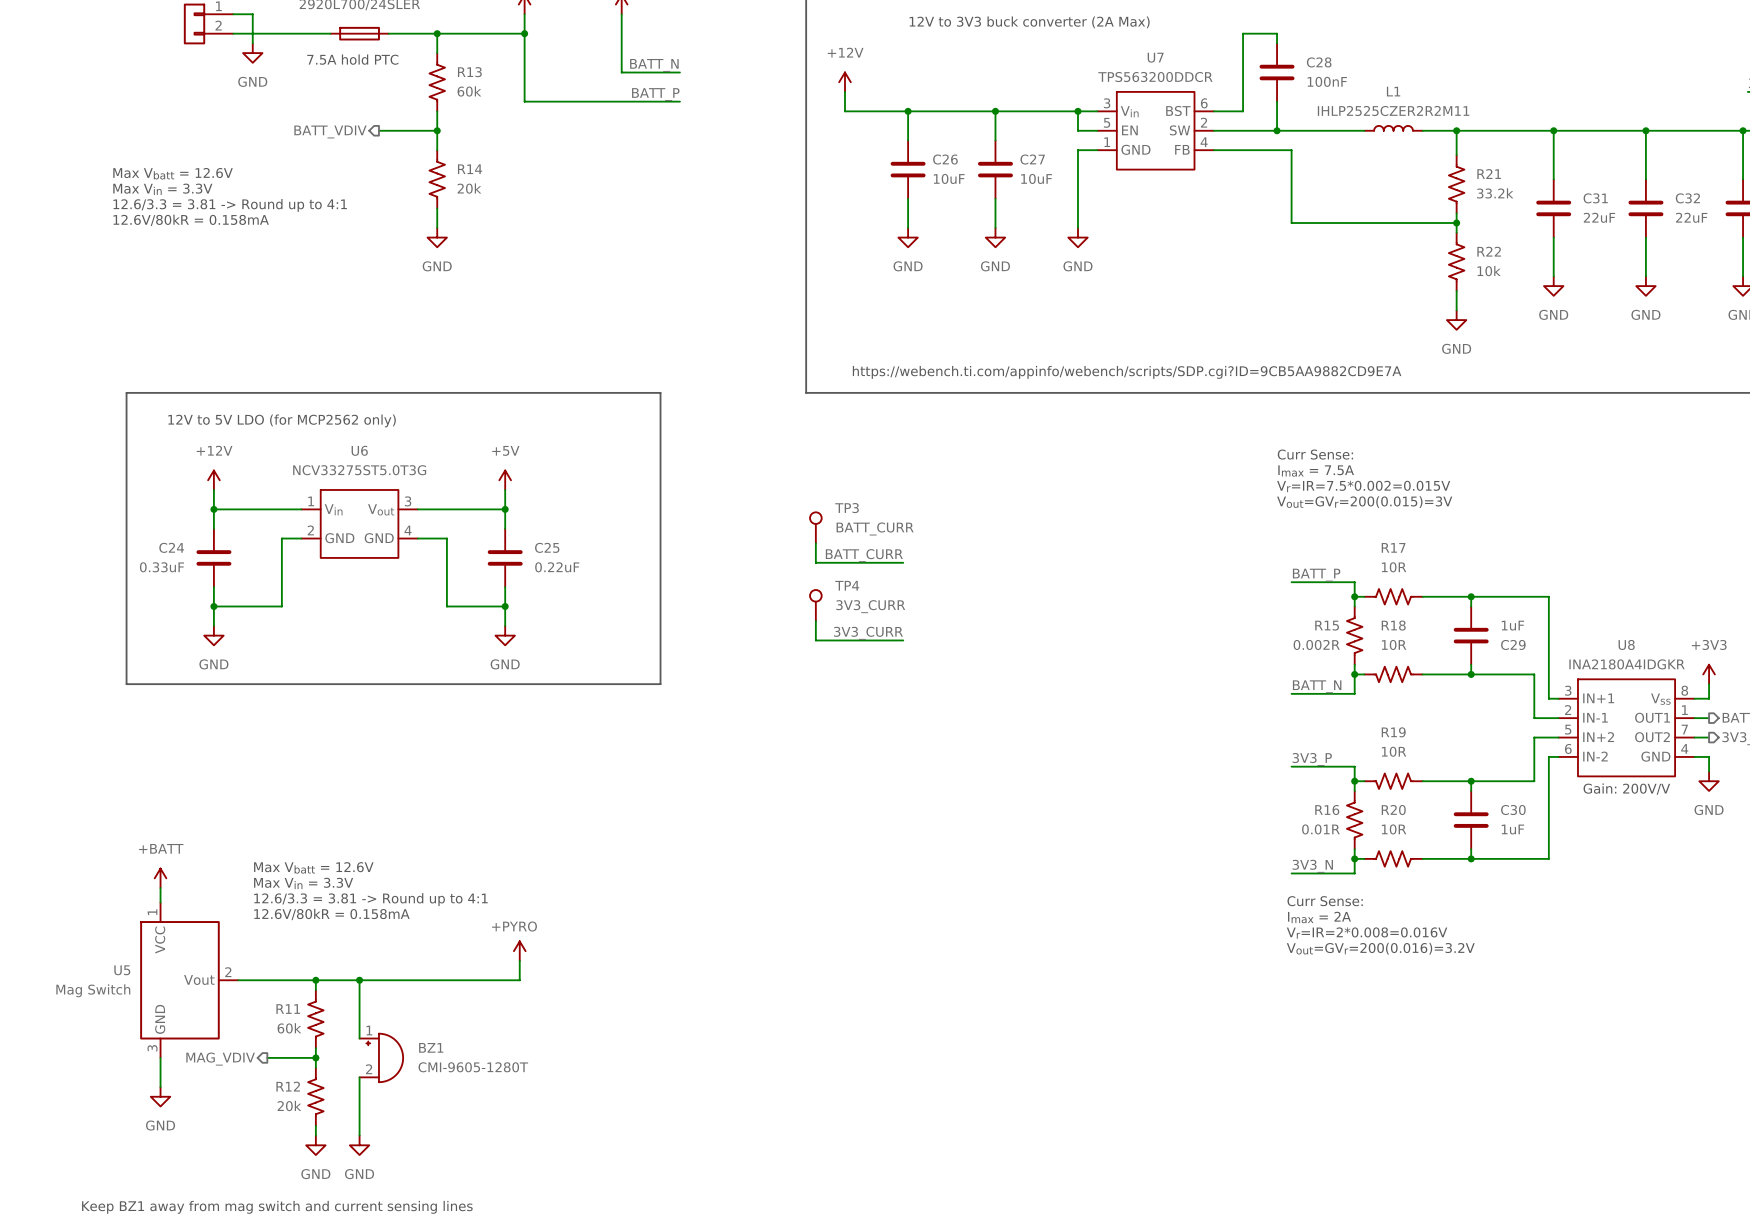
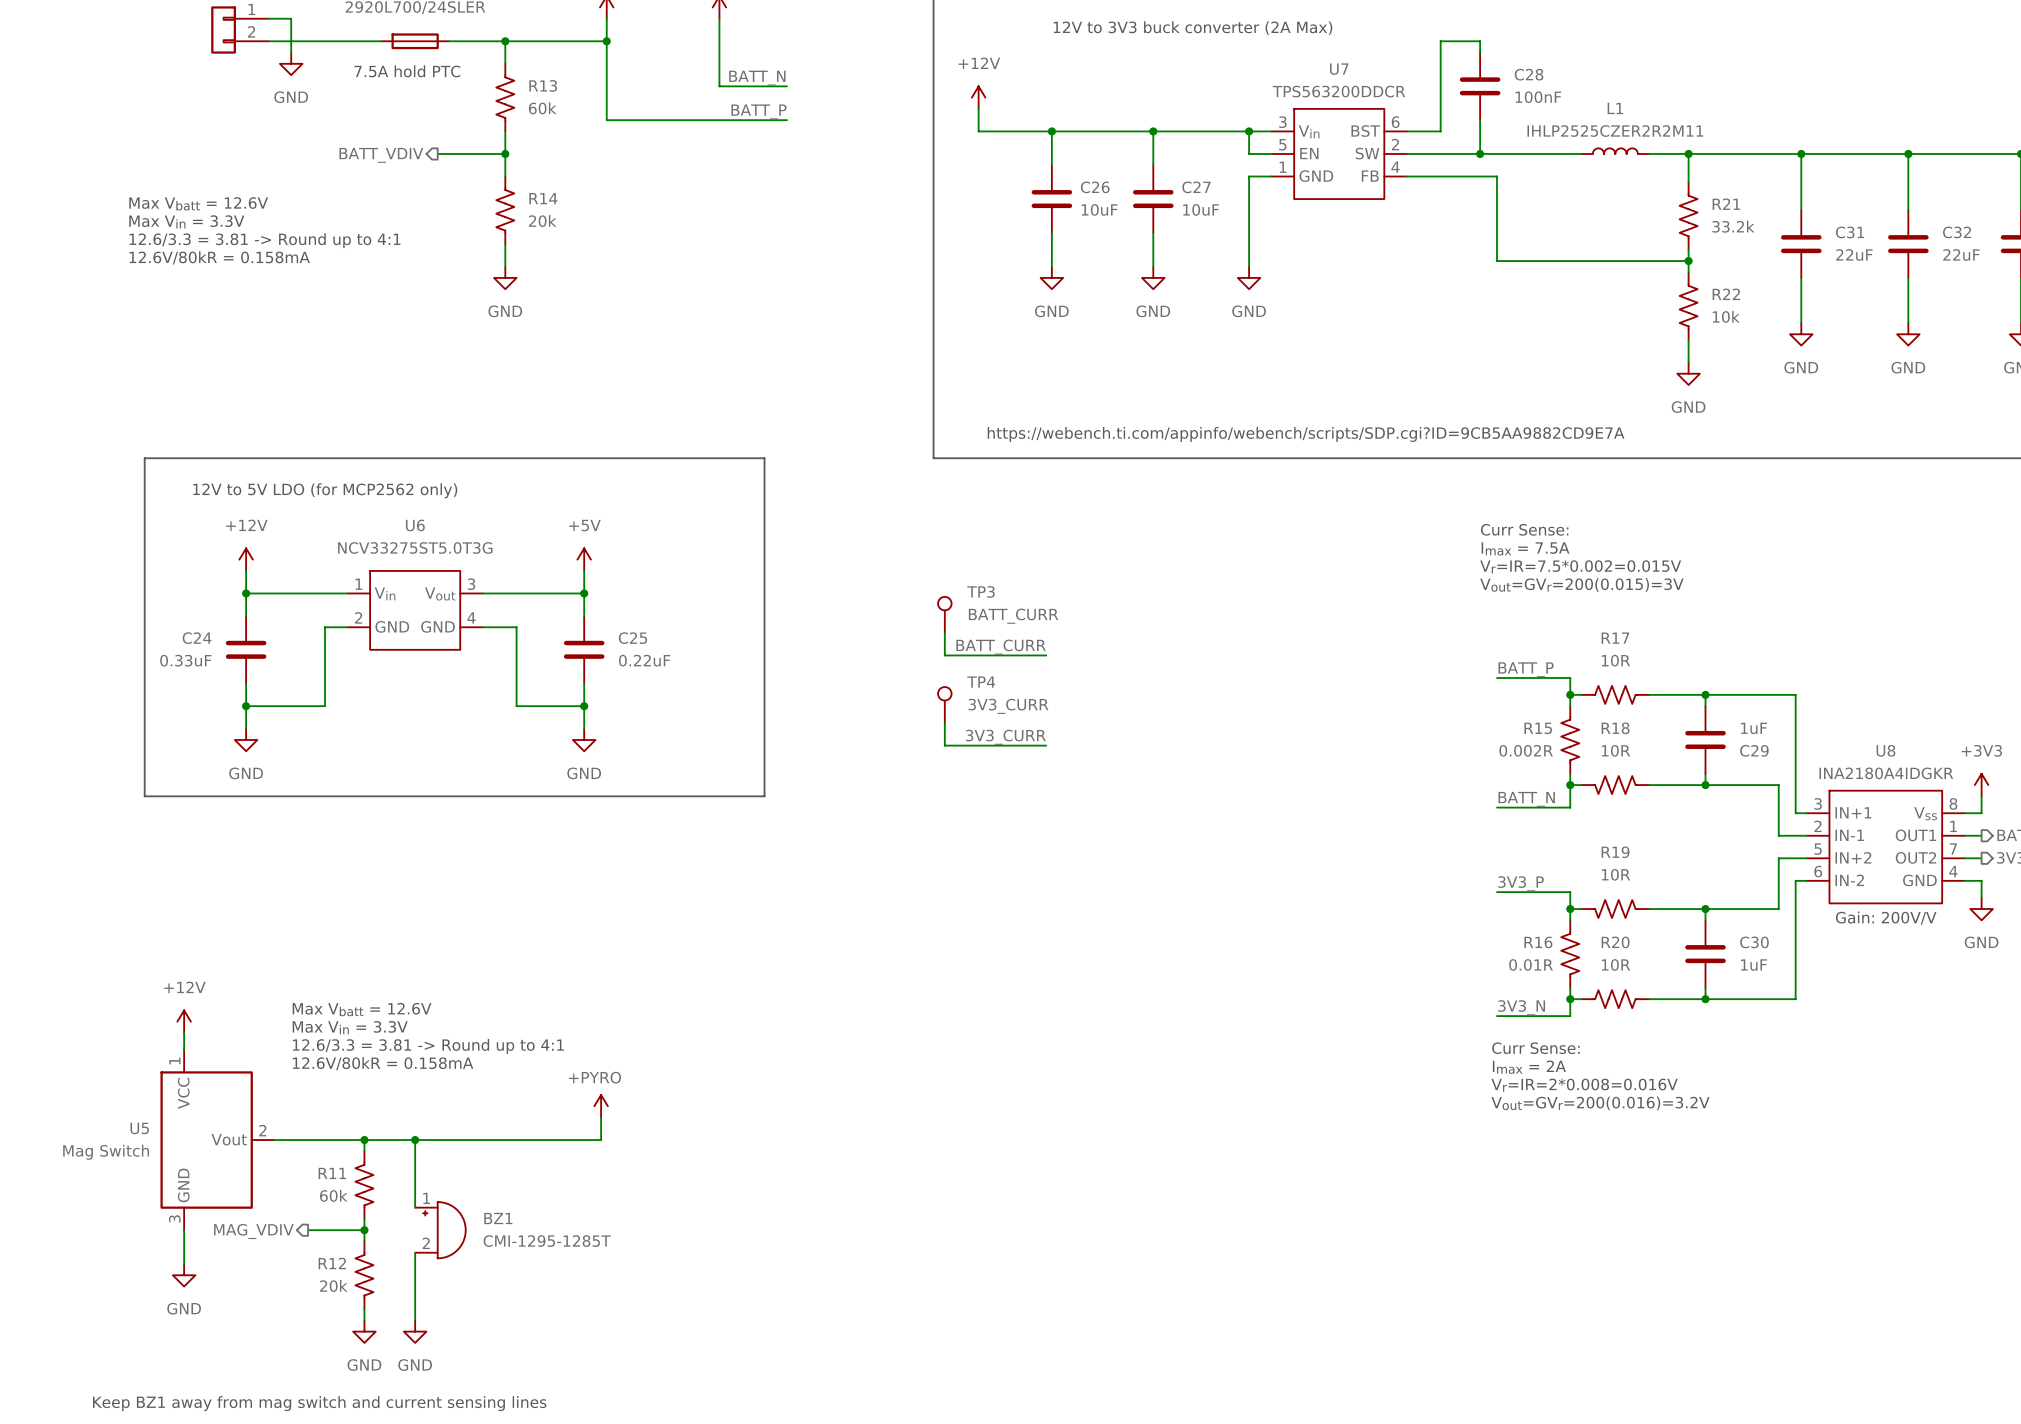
power symbol: +BATT (160, 878) -> +12V (184, 1021)
BZ1 value: CMI-9605-1280T (473, 1067) -> CMI-1295-1285T (547, 1241)

